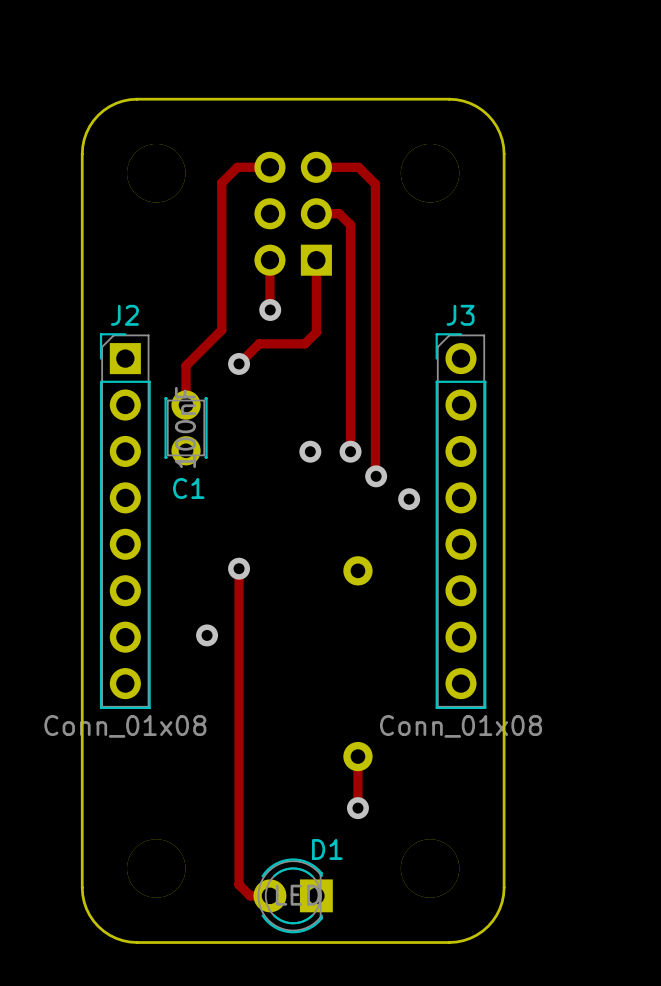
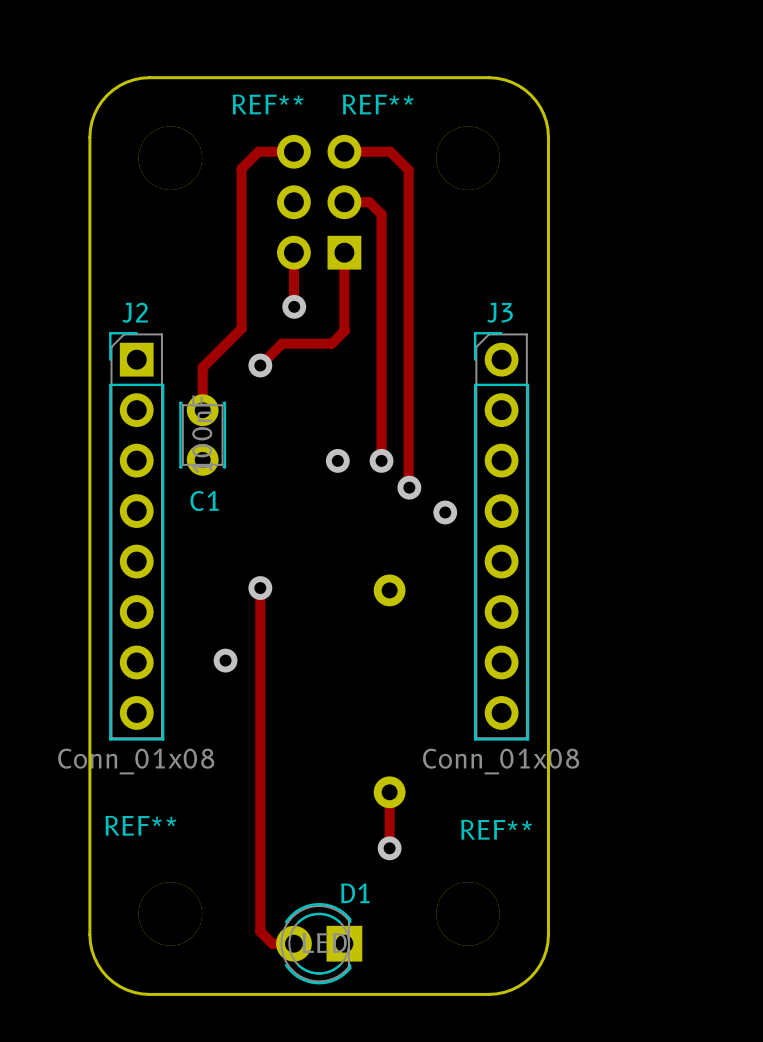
REF** name: none -> REF** (268, 104)
REF** name: none -> REF** (378, 104)
REF** name: none -> REF** (140, 825)
REF** name: none -> REF** (496, 829)

